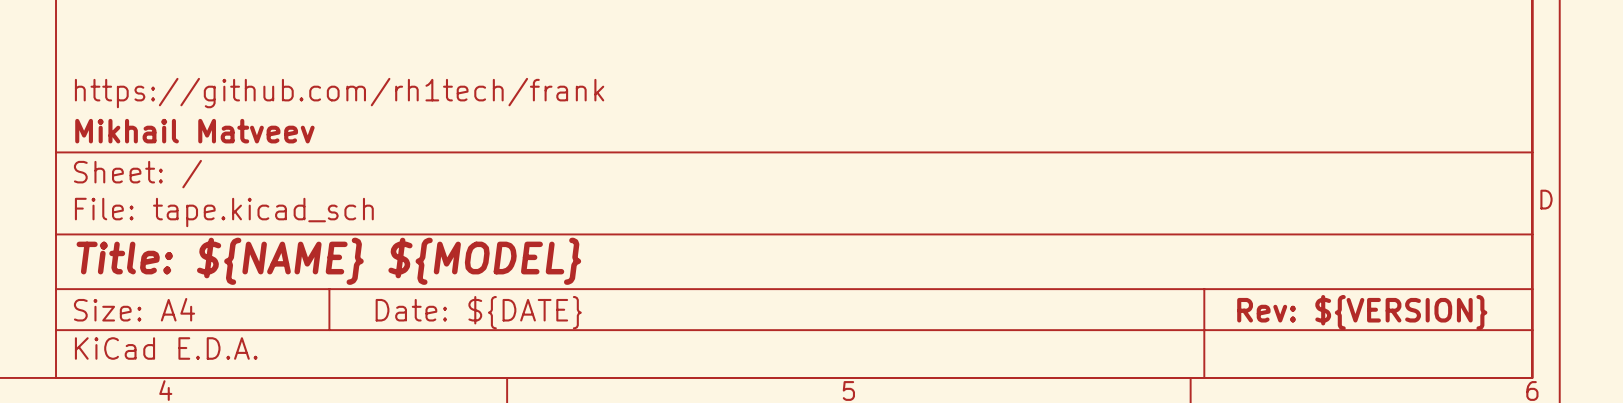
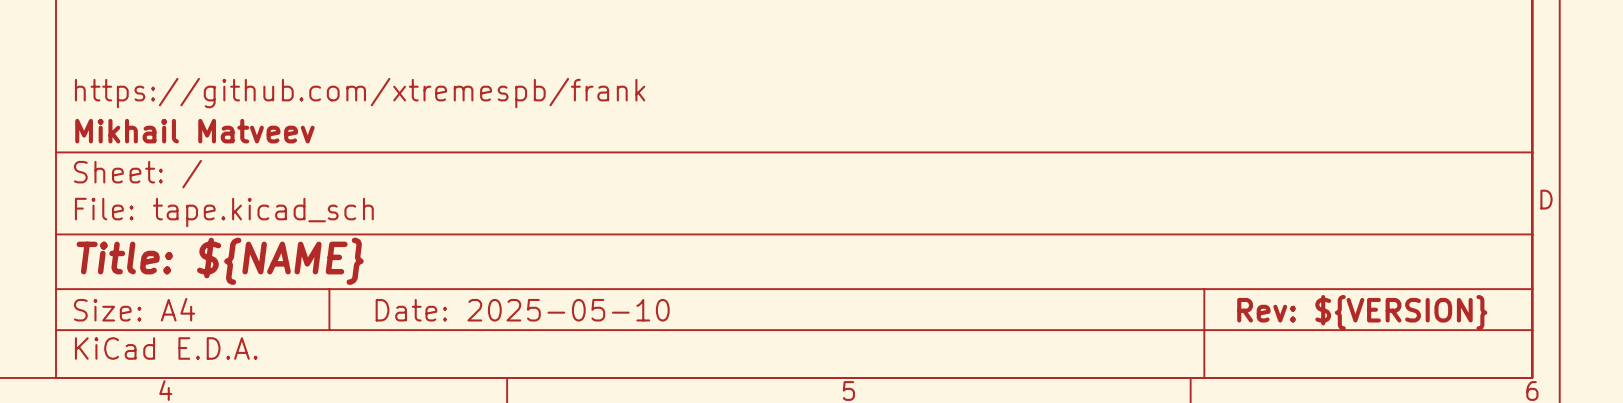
title block: https://github.com/rh1tech/frank (339, 93) -> https://github.com/xtremespb/frank (360, 93)
title block: Title: ${NAME} ${MODEL} (328, 261) -> Title: ${NAME} (220, 261)
title block: Date: ${DATE} (478, 312) -> Date: 2025-05-10 (522, 310)

